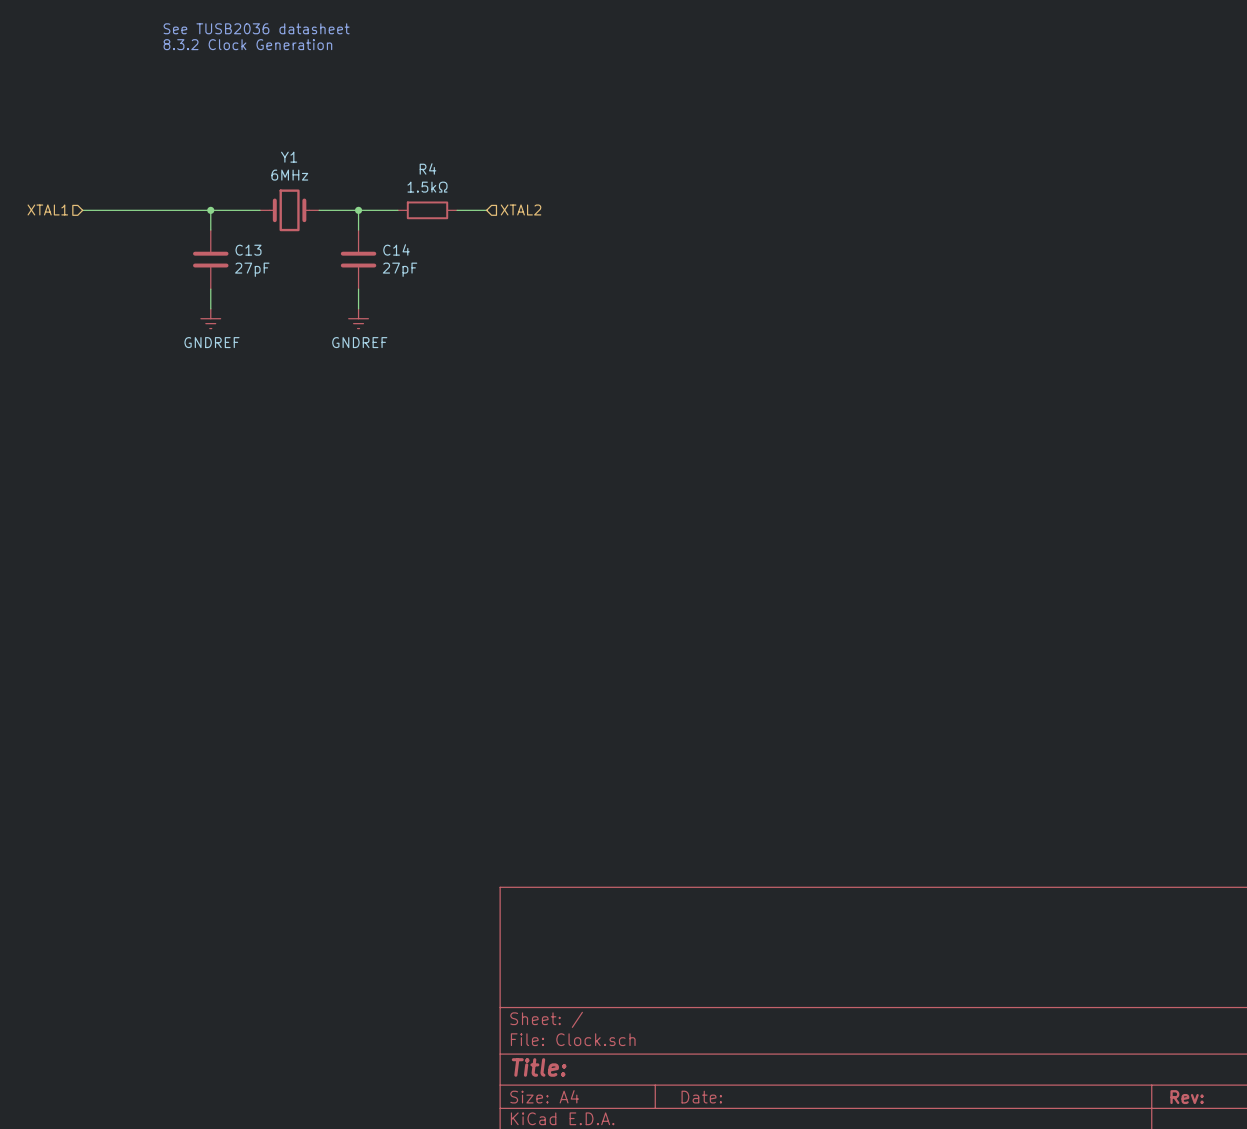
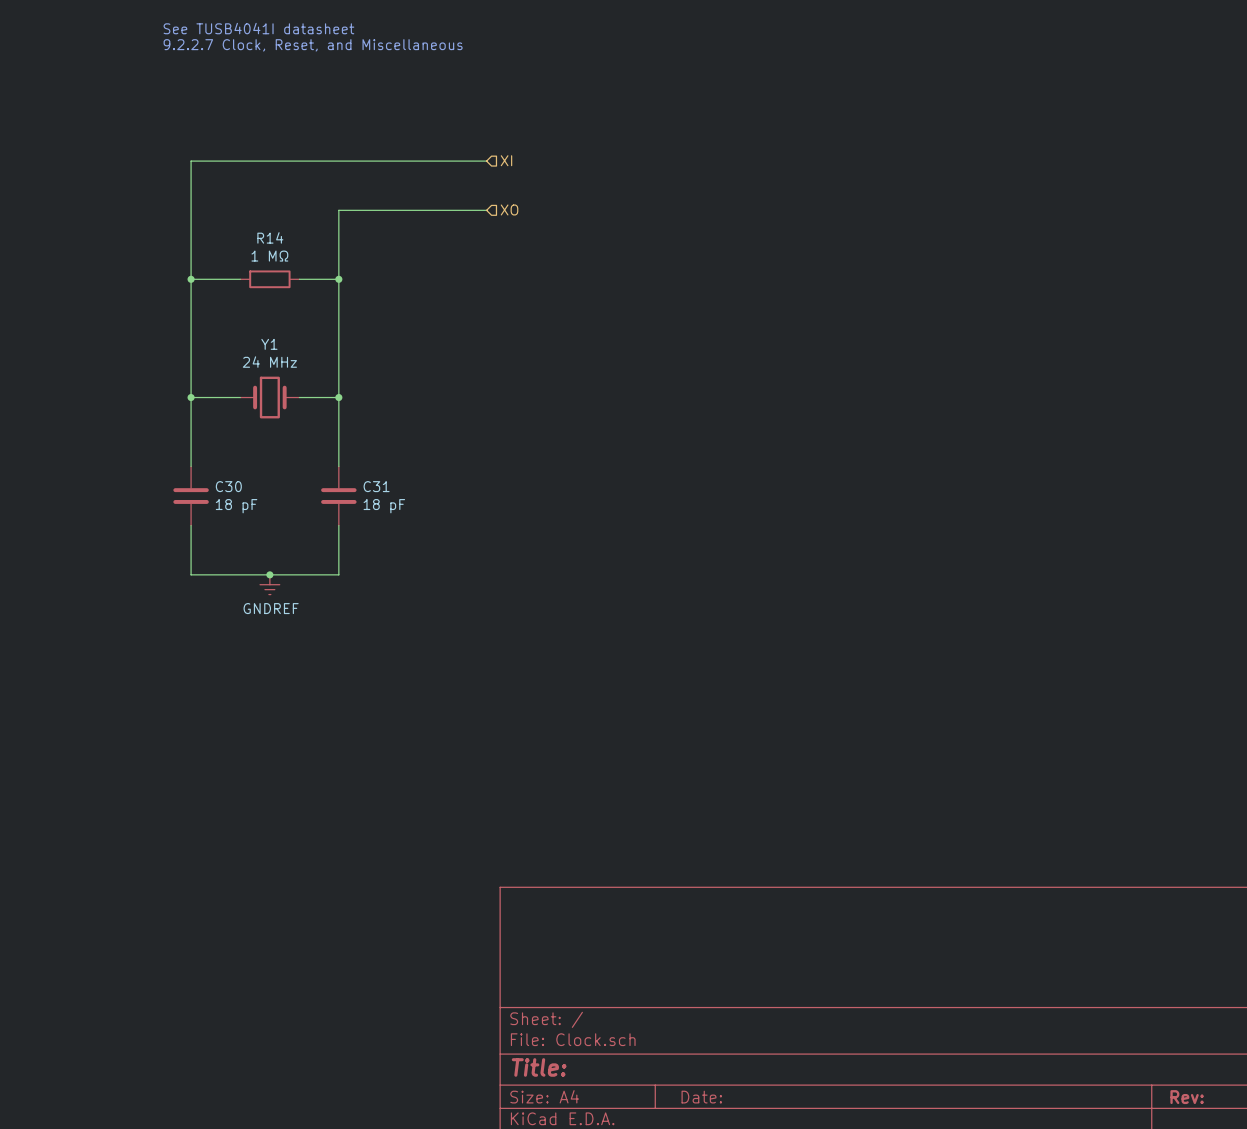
text: See TUSB2036 datasheet (256, 28) -> See TUSB4041I datasheet (258, 28)
text: 8.3.2 Clock Generation (247, 44) -> 9.2.2.7 Clock, Reset, and Miscellaneous (313, 45)
hierarchical label: none -> XI (506, 160)
wire: none -> (486, 161) (191, 161) (191, 466)
Y1 value: 6MHz (289, 175) -> 24 MHz (269, 362)
hierarchical label: XTAL1 (47, 209) -> none
hierarchical label: XTAL2 (521, 209) -> XO (509, 209)
wire: (82, 210) (260, 210) -> none
wire: (210, 210) (210, 230) -> none
junction: (210, 210) -> none
Y1 position: (289, 210) -> (269, 397)
wire: (319, 210) (338, 210) -> (338, 466) (338, 210)
wire: (358, 210) (358, 230) -> none
junction: (358, 210) -> none
wire: none -> (397, 210) (457, 210)
R4: 1.5kΩ (427, 210) -> none
C13: 27pF (210, 259) -> none
C14: 27pF (358, 259) -> none
wire: none -> (191, 279) (240, 279)
junction: none -> (191, 279)
R14: none -> 1 MΩ (269, 279)
wire: none -> (299, 279) (338, 279)
junction: none -> (338, 279)
wire: (210, 289) (210, 308) -> none
wire: (358, 289) (358, 308) -> none
power symbol: GNDREF (210, 318) -> none
power symbol: GNDREF (358, 318) -> none
wire: none -> (191, 397) (240, 397)
junction: none -> (191, 397)
wire: none -> (299, 397) (338, 397)
junction: none -> (338, 397)
C30: none -> 18 pF (191, 496)
C31: none -> 18 pF (338, 496)
wire: none -> (191, 525) (191, 574) (338, 574) (338, 525)
junction: none -> (269, 574)
power symbol: none -> GNDREF (269, 584)

